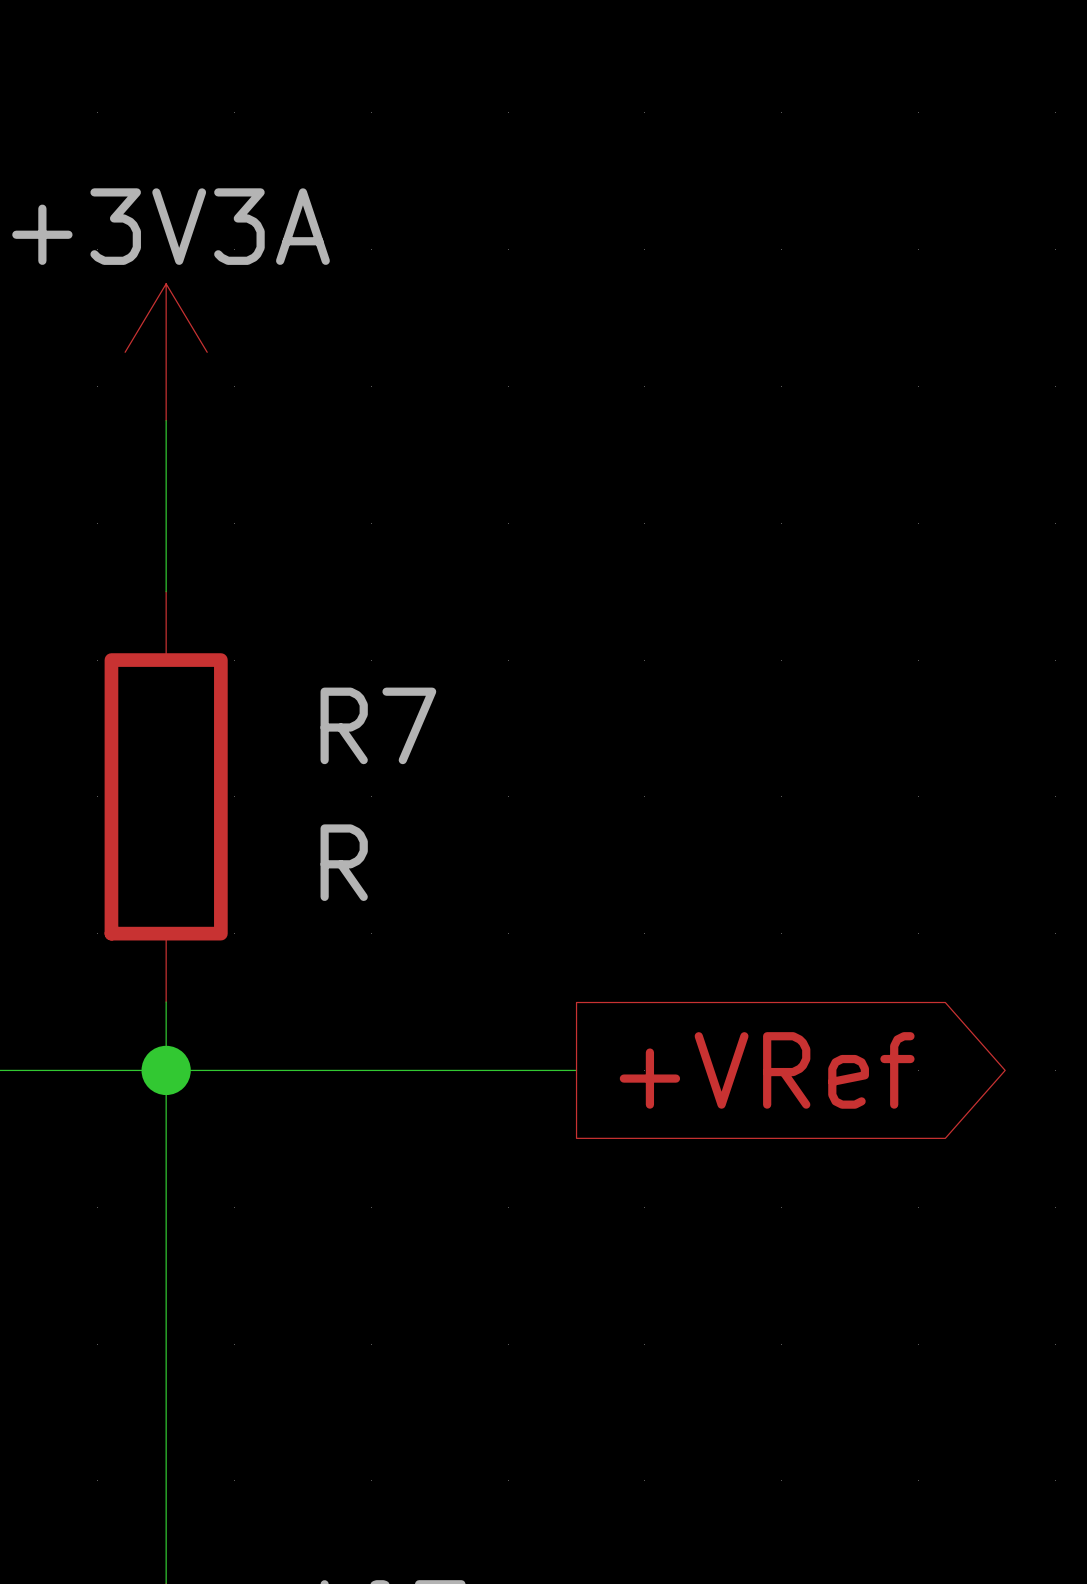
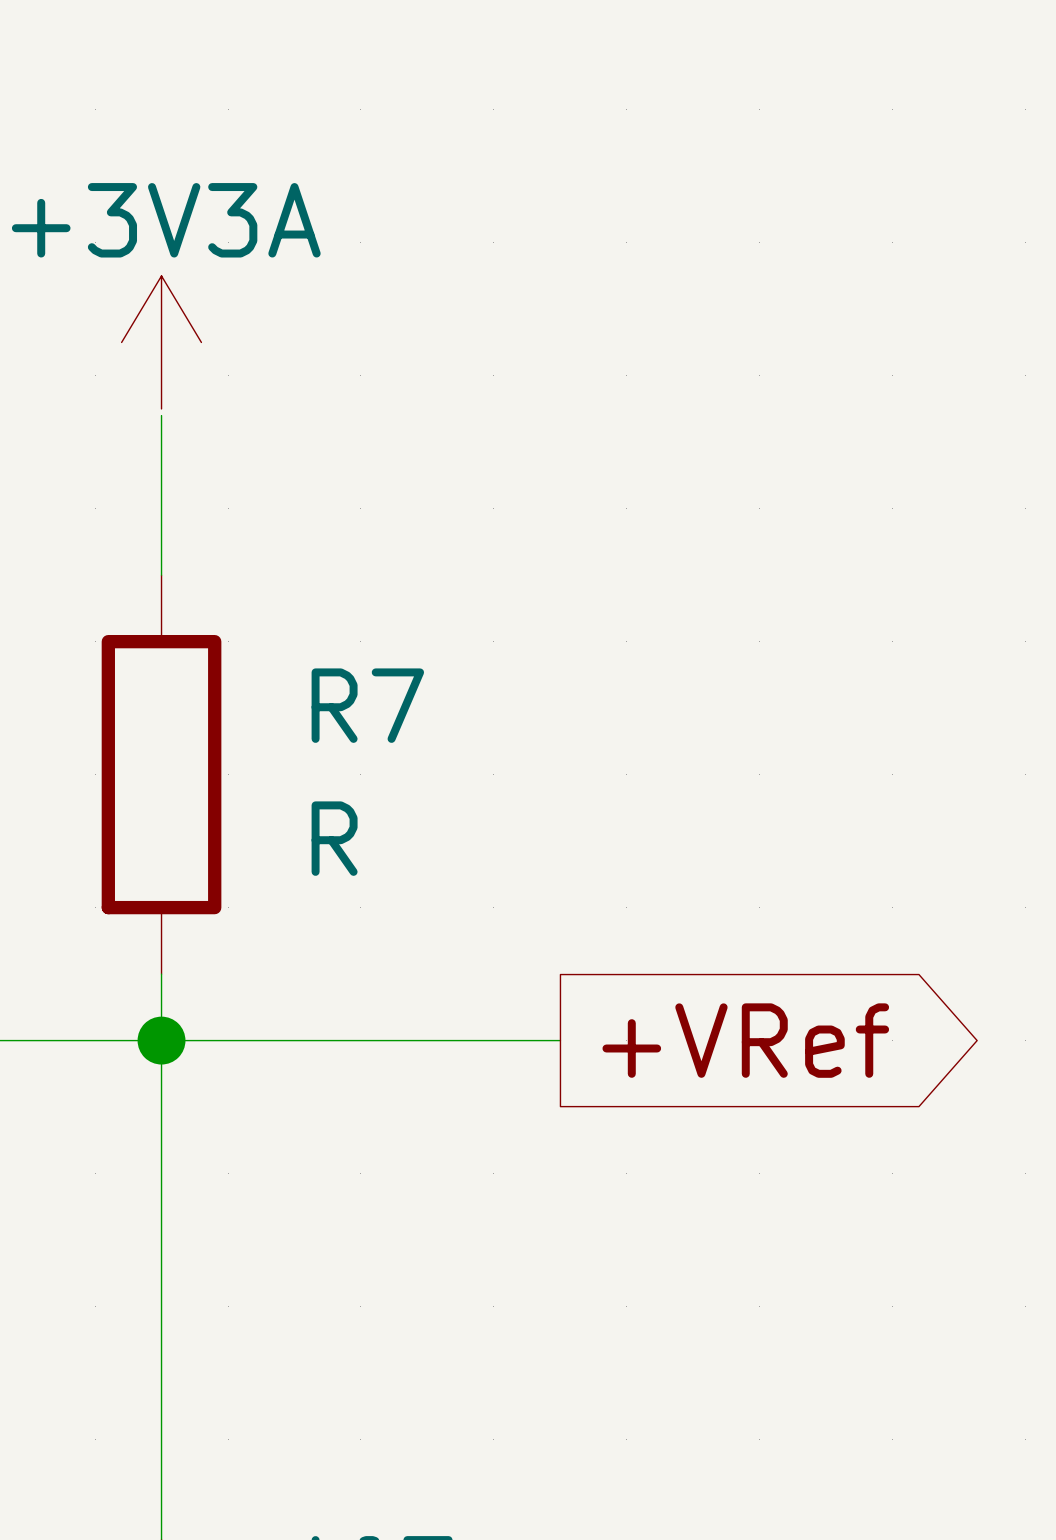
wire: (166, 420) (166, 427) -> none

